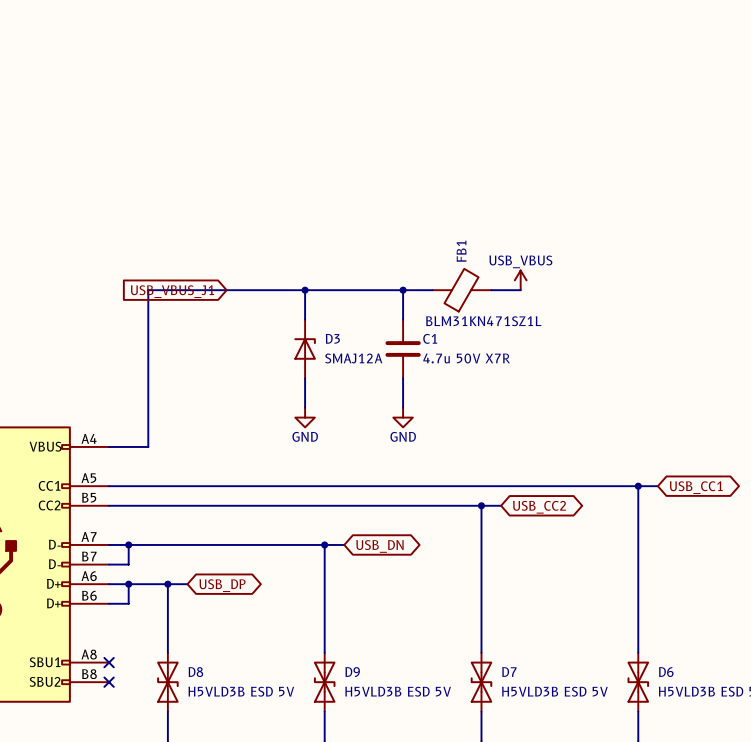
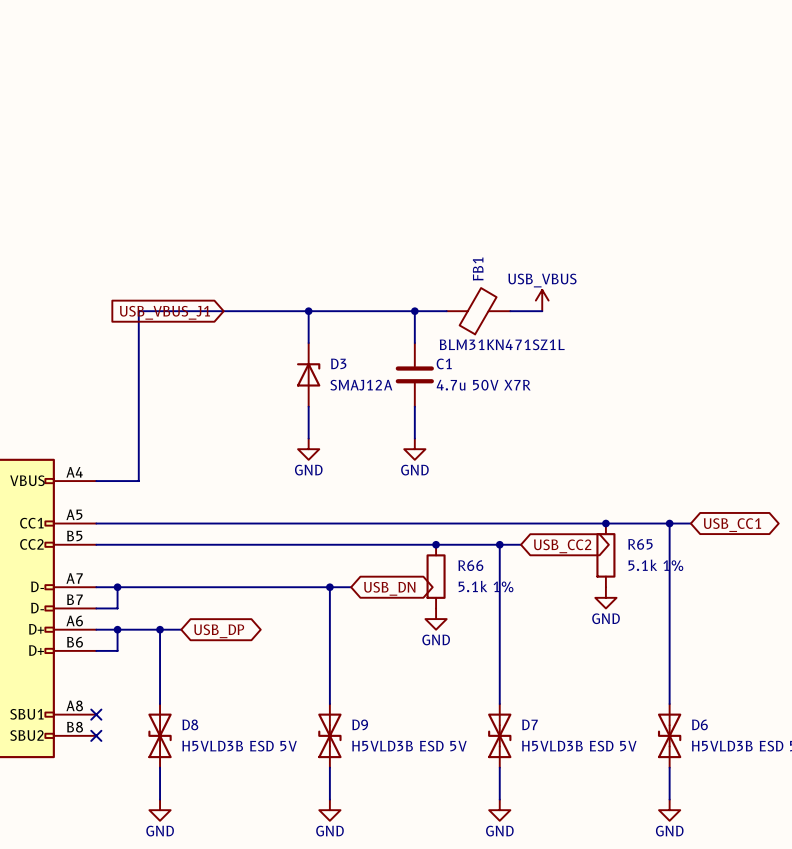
junction: none -> (605, 523)
junction: none -> (436, 544)
R65: none -> 5.1k 1% (605, 555)
R66: none -> 5.1k 1% (436, 576)
power symbol: none -> GND (605, 597)
power symbol: none -> GND (436, 619)

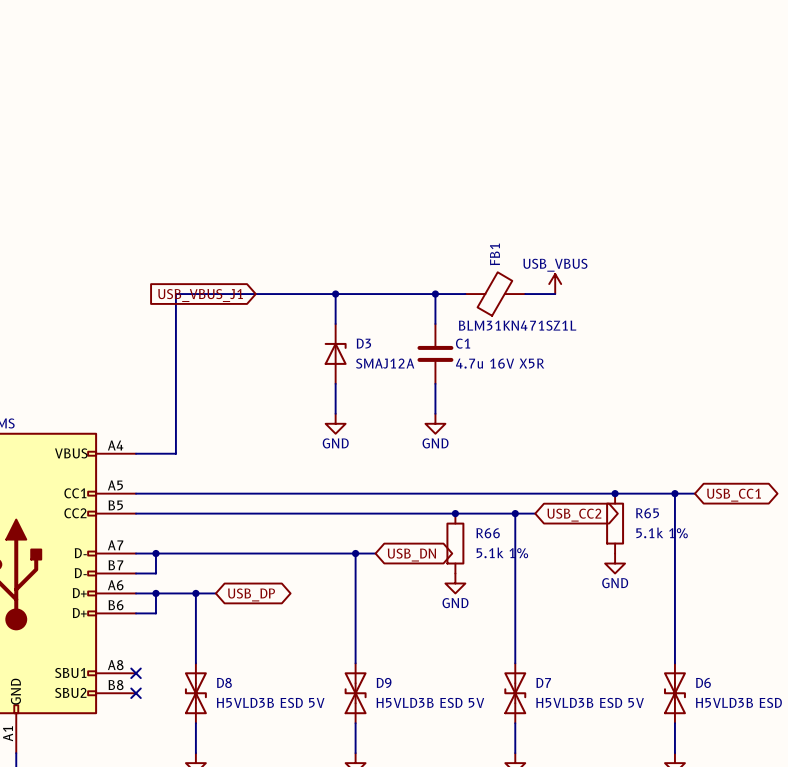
C1 value: 4.7u 50V X7R (483, 385) -> 4.7u 16V X5R (500, 363)

